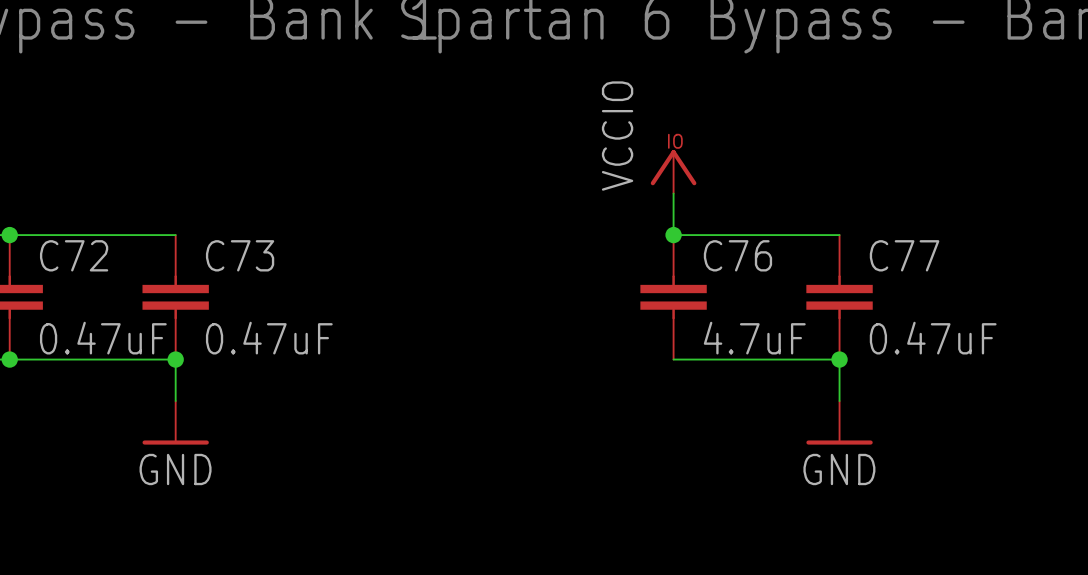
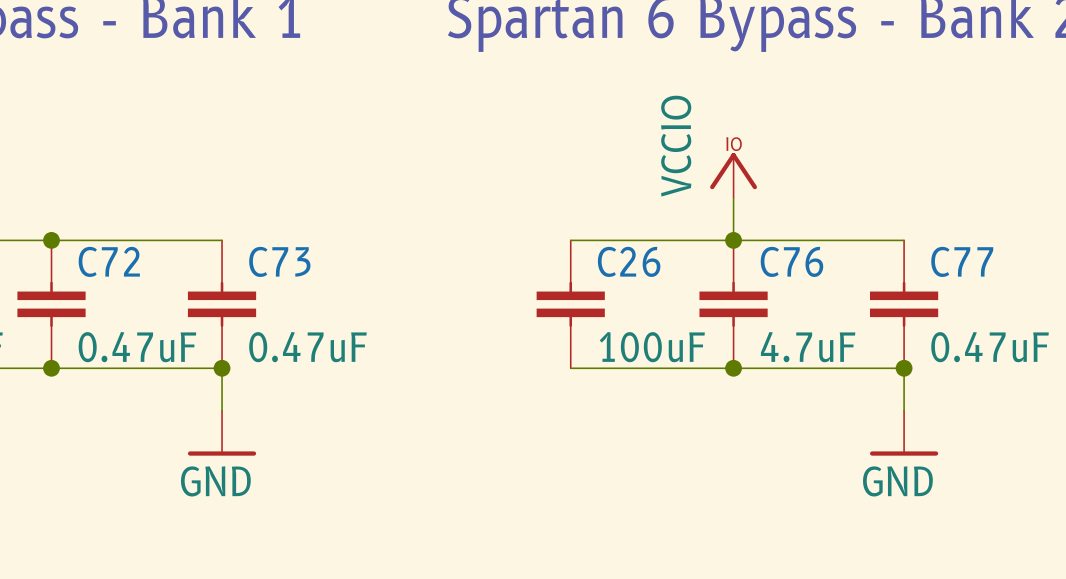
wire: none -> (570, 240) (733, 240)
C26: none -> 100uF (570, 304)
wire: none -> (570, 368) (733, 368)
junction: none -> (733, 368)

